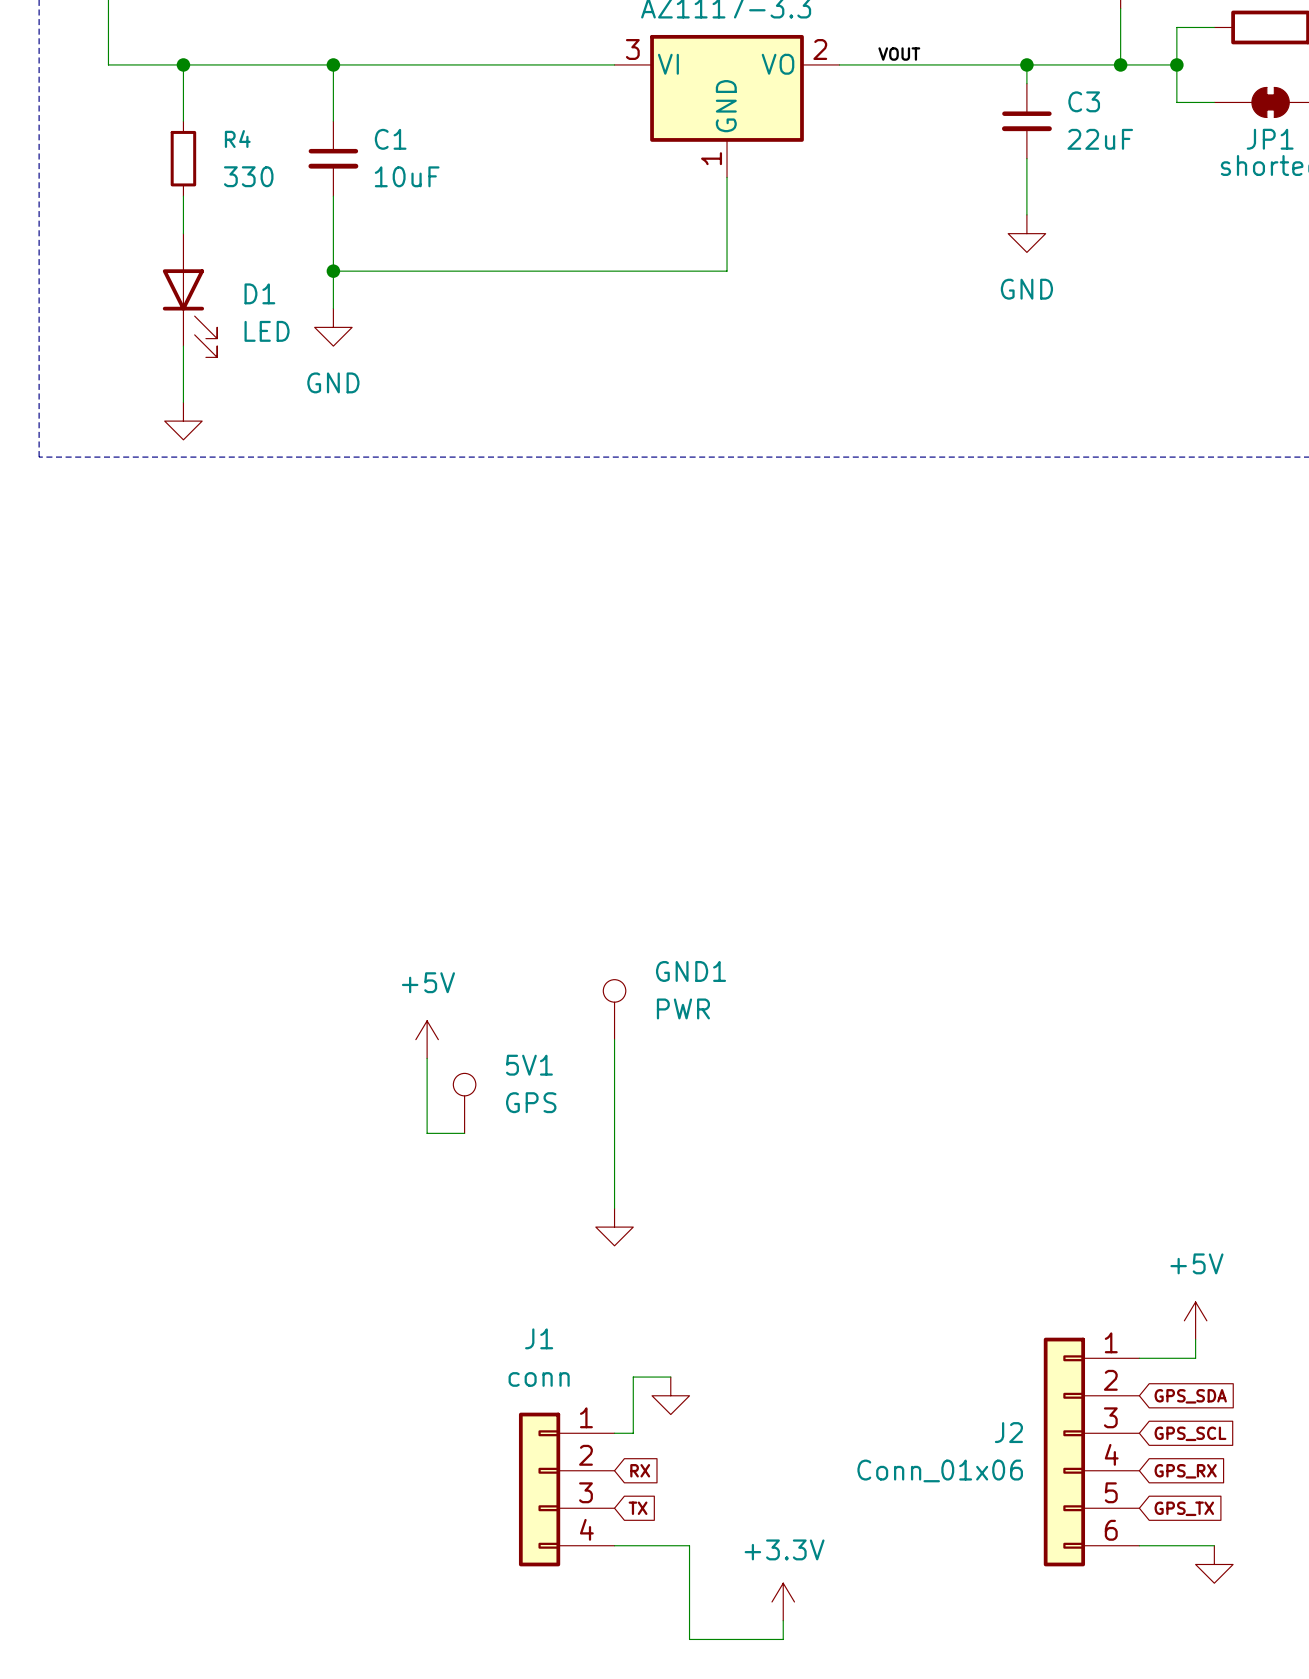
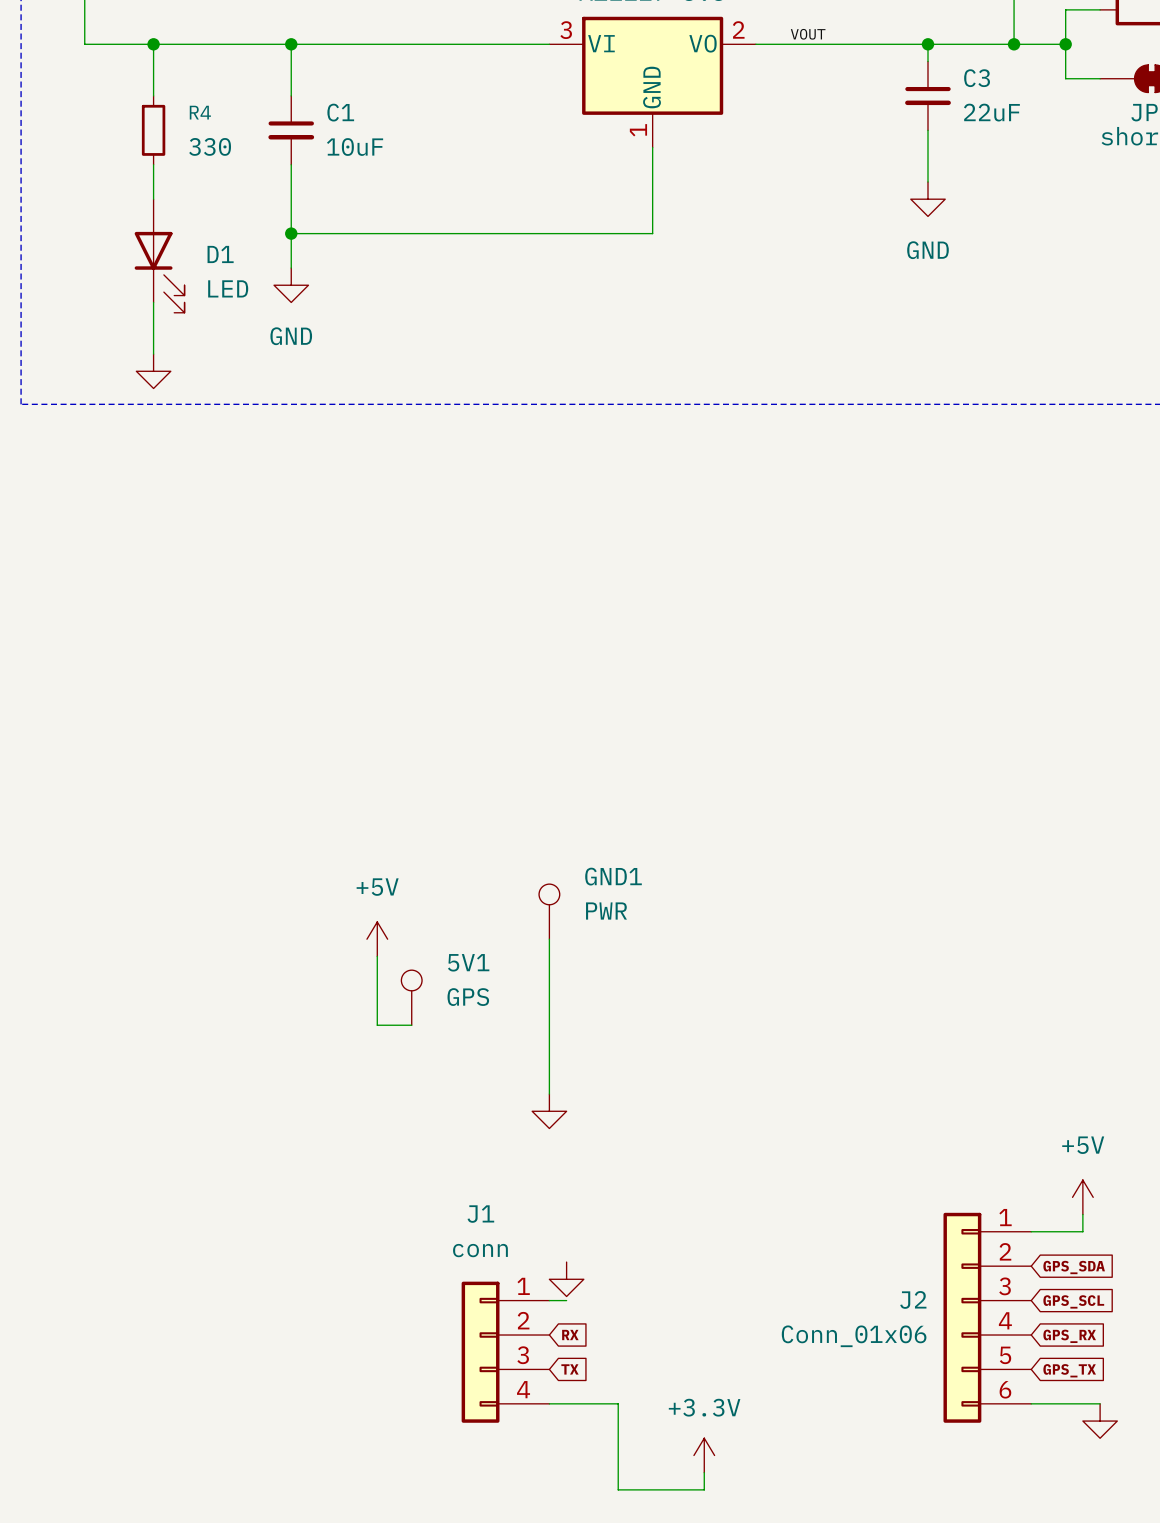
wire: (670, 1377) (633, 1377) (633, 1433) -> none
power symbol position: (670, 1395) -> (566, 1279)

